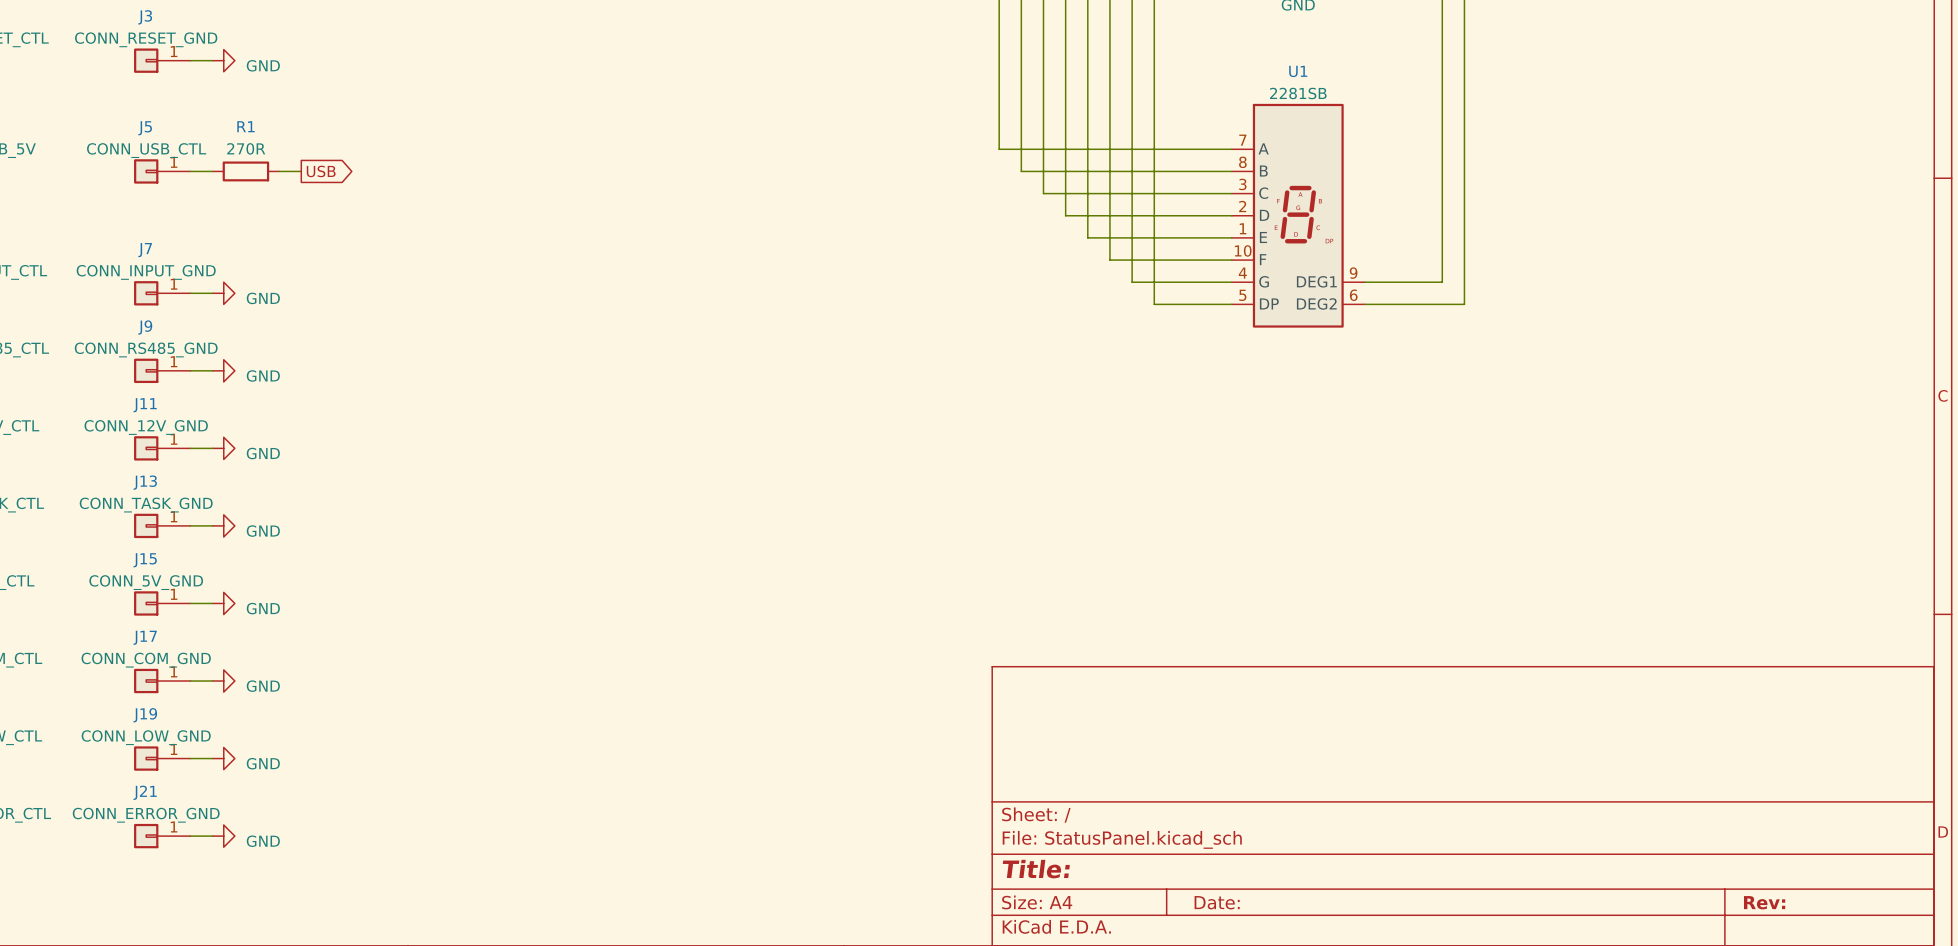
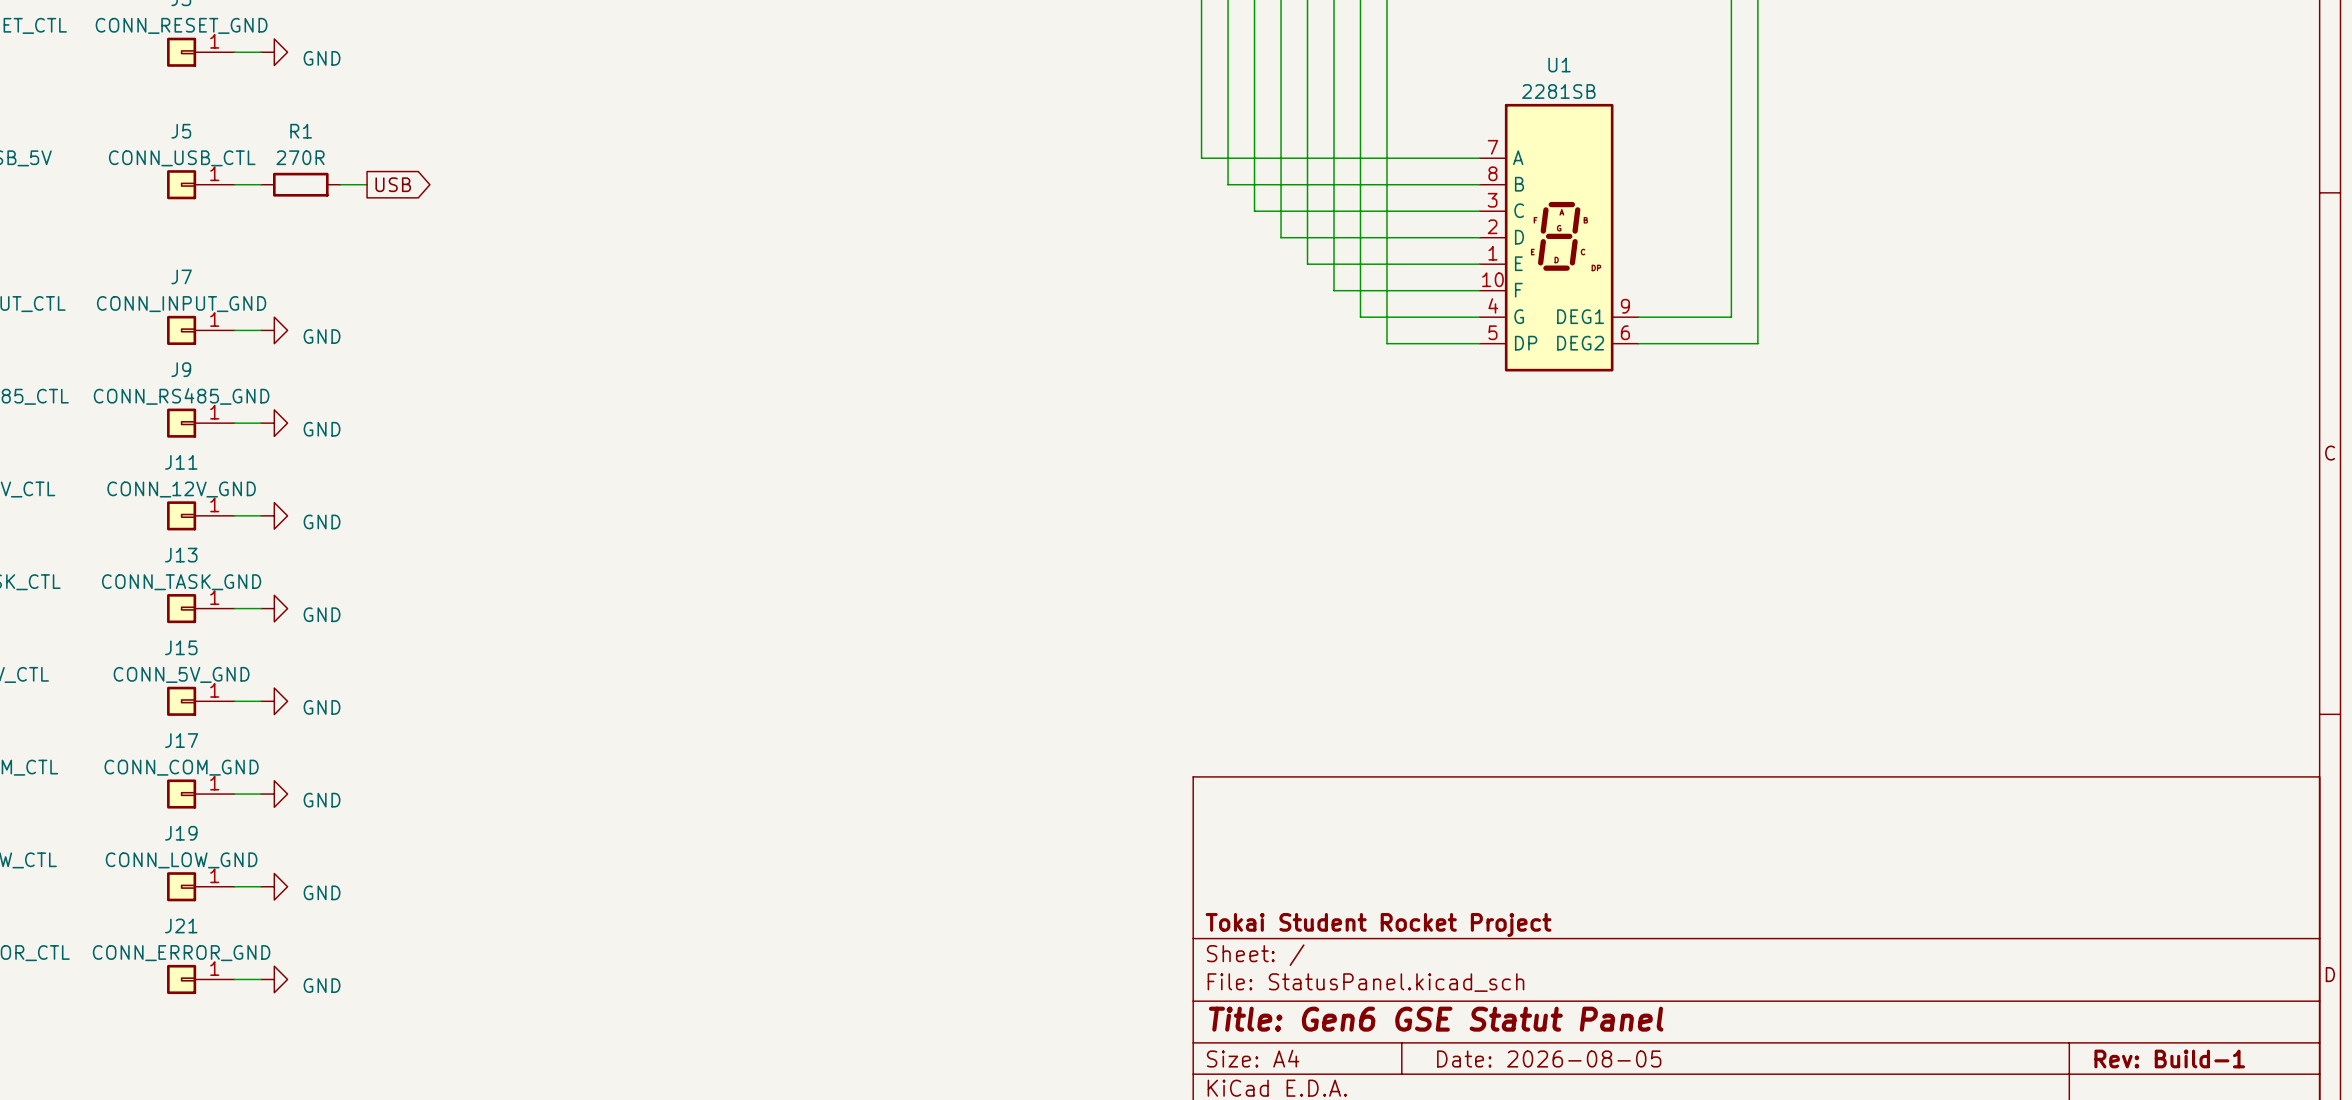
title block: none -> Tokai Student Rocket Project (1378, 924)
title block: Title: (1036, 869) -> Title: Gen6 GSE Statut Panel (1436, 1019)
title block: Date: (1217, 902) -> Date: 2026-08-05 (1549, 1058)
title block: Rev: (1764, 902) -> Rev: Build-1 (2169, 1058)

